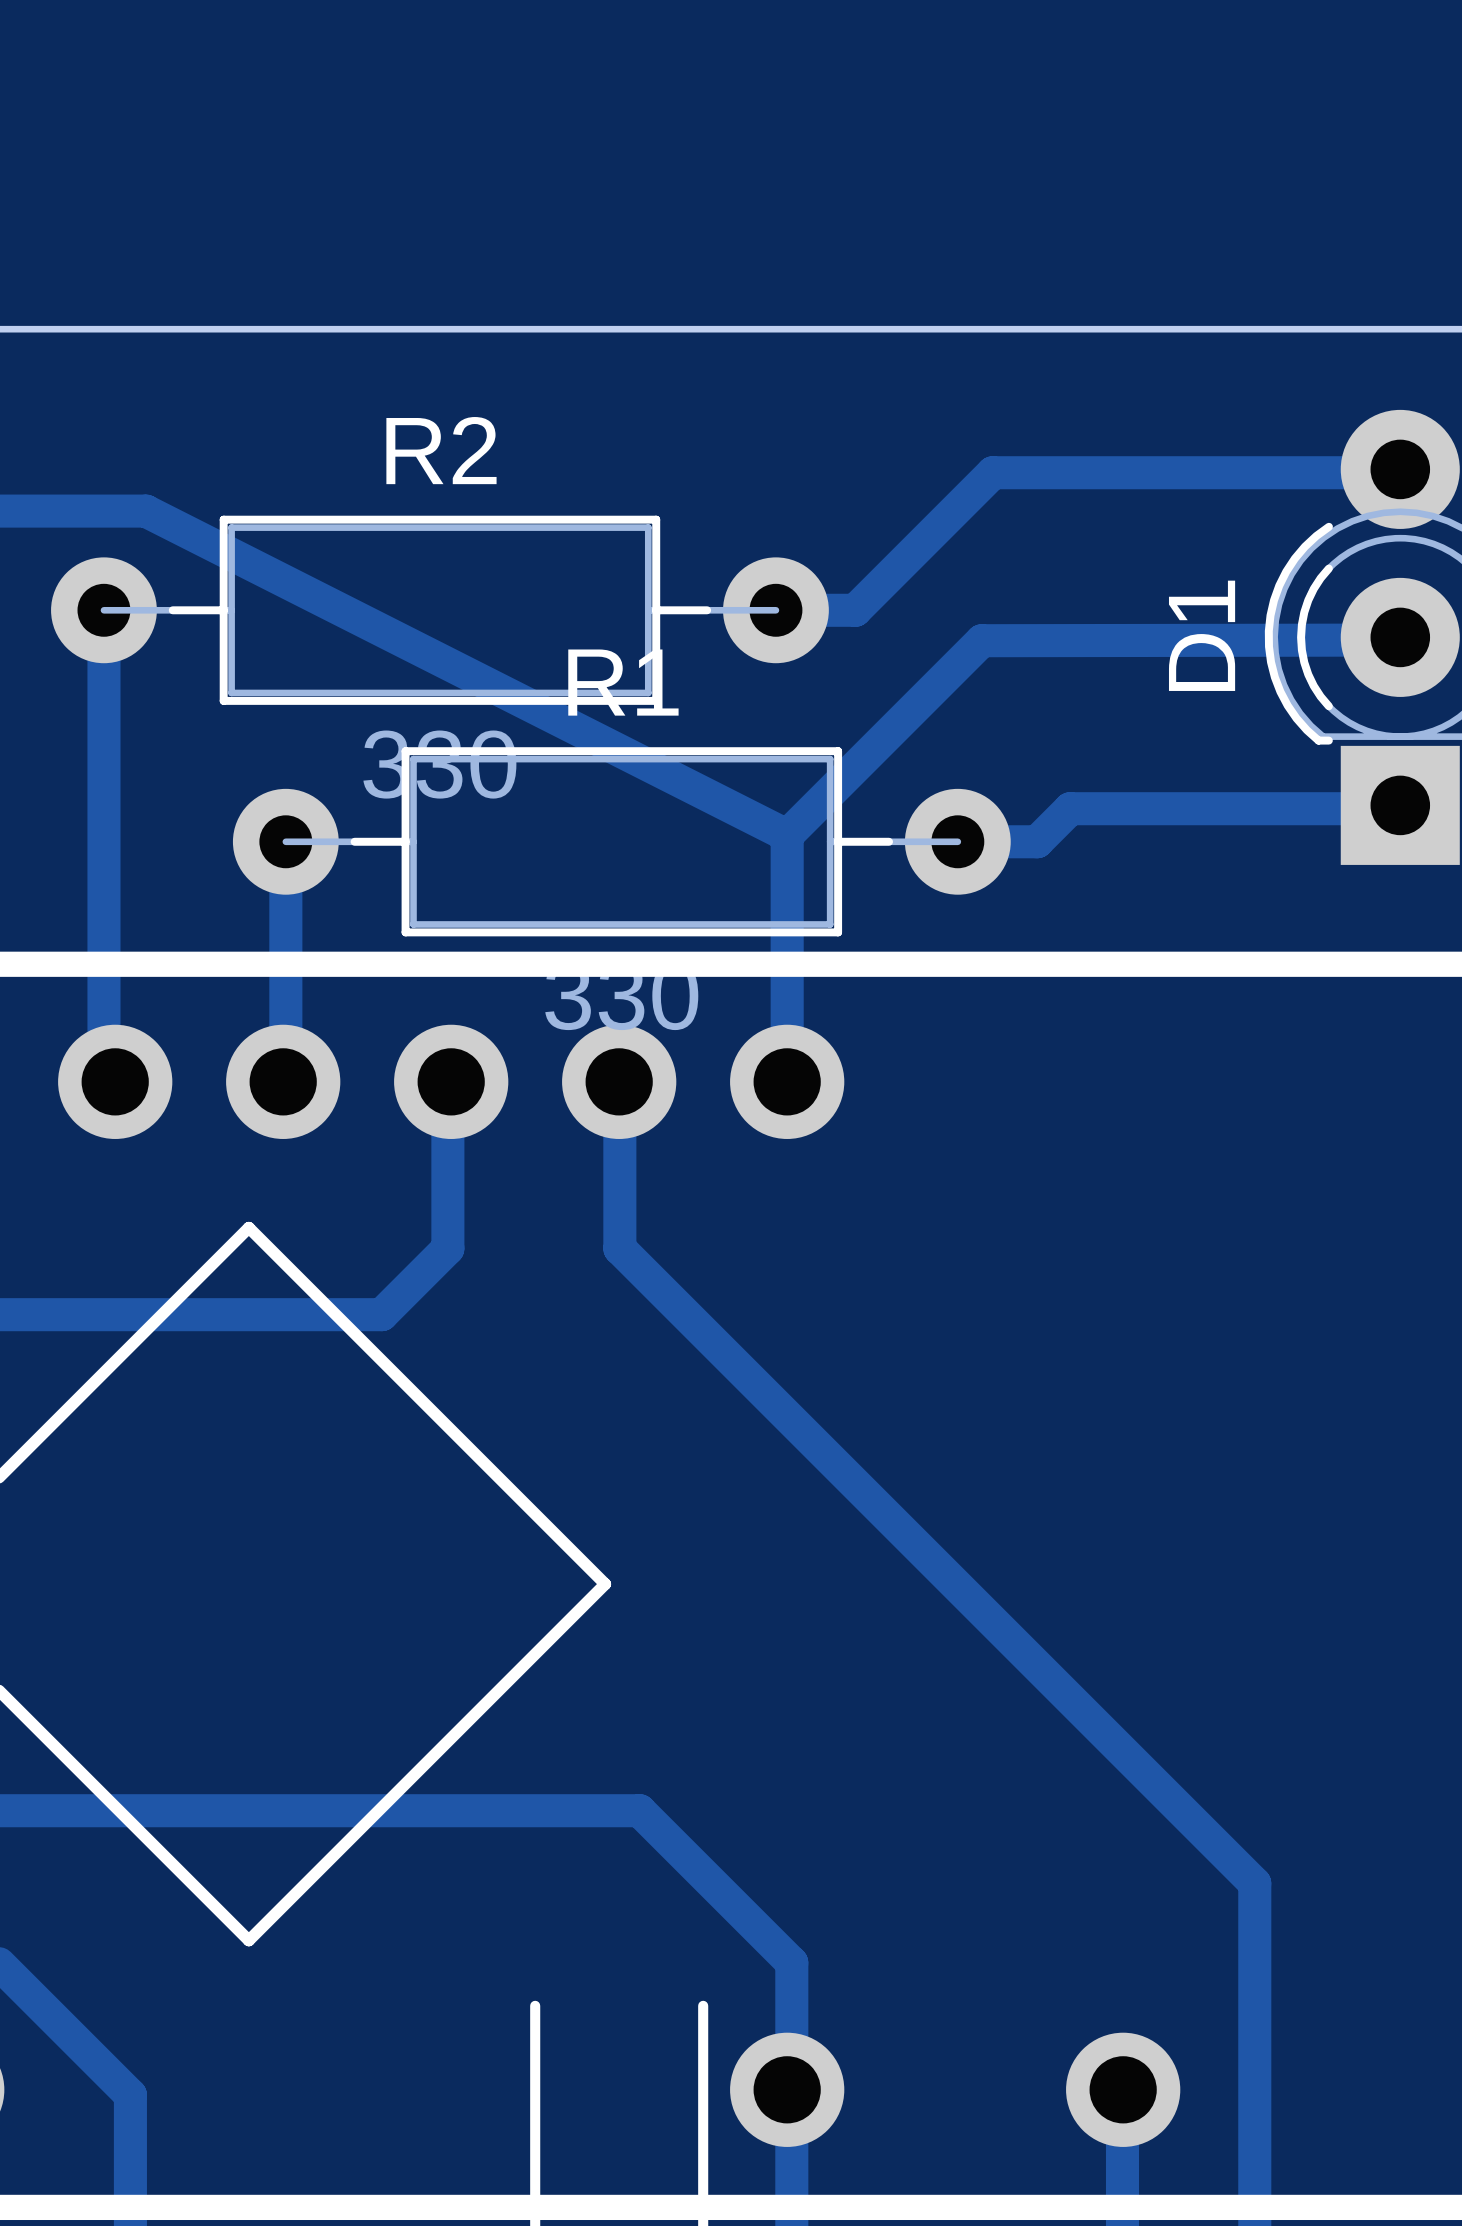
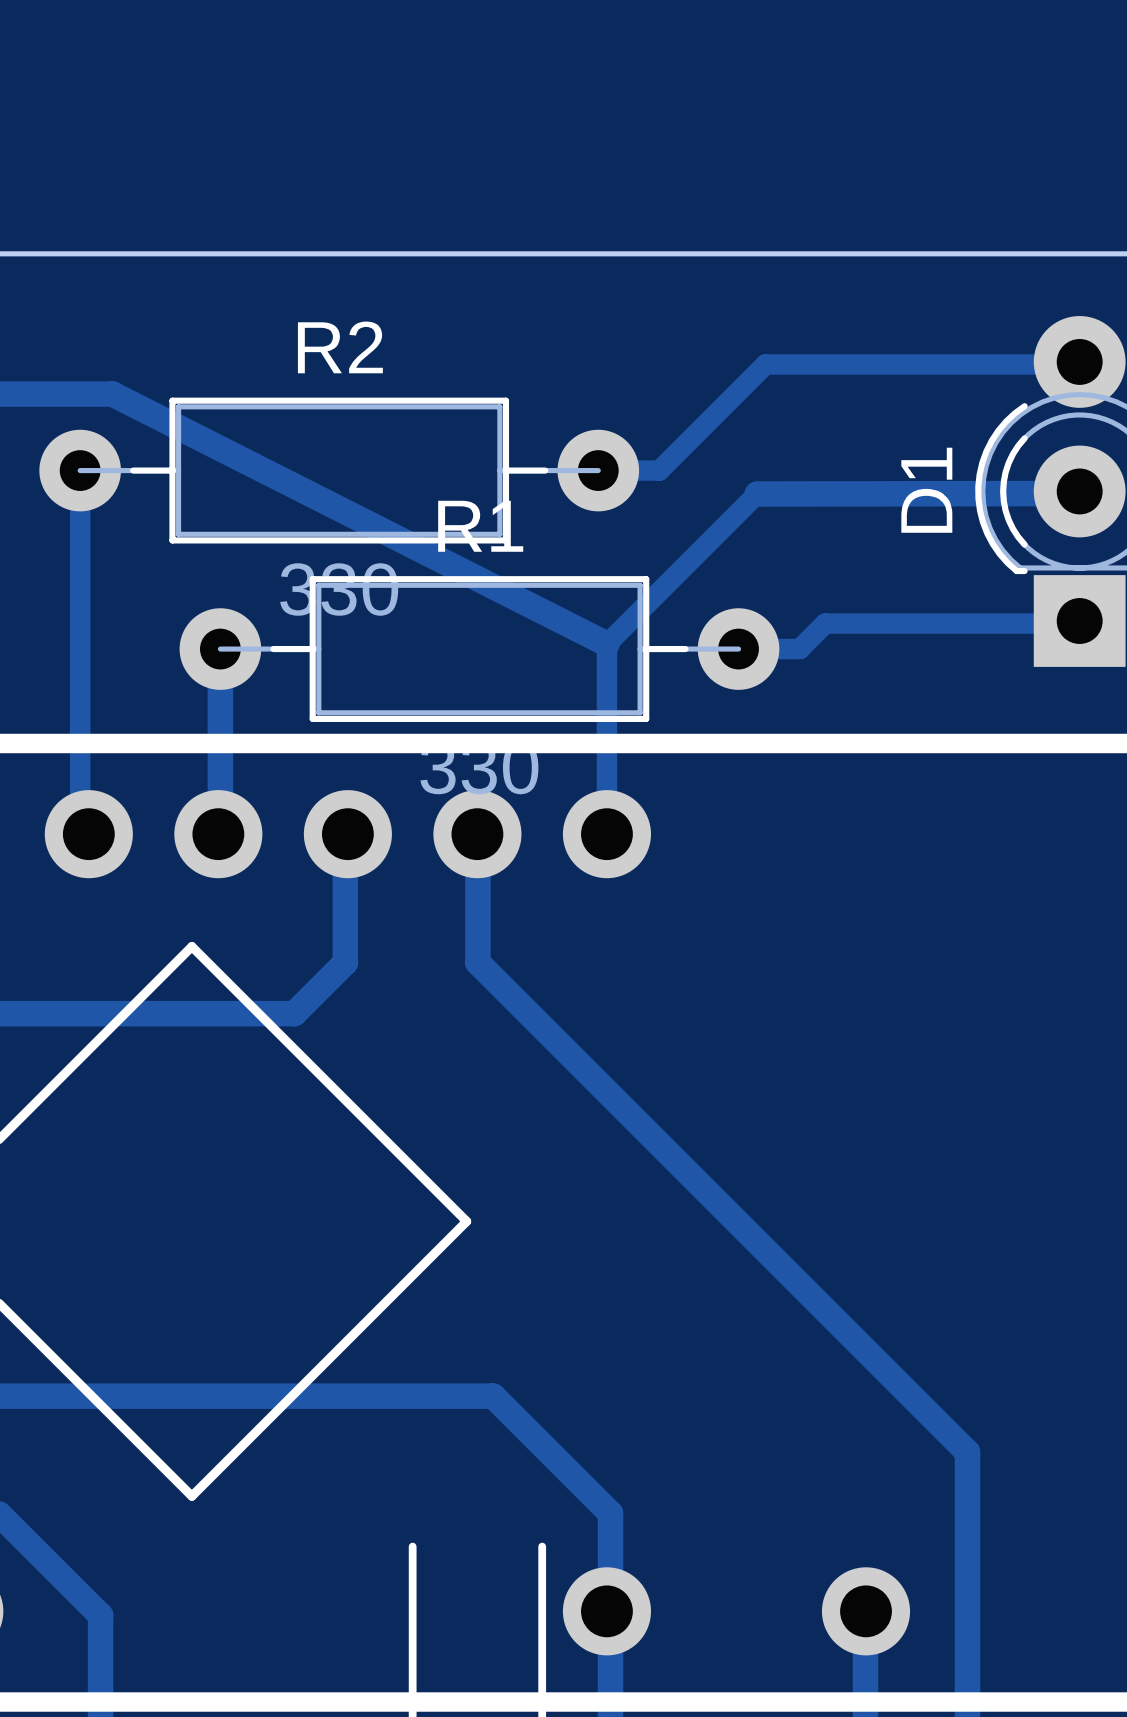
track width: thick (1400, 472) (992, 472) (855, 610) (775, 610) -> thin (1079, 364) (765, 364) (659, 470) (598, 470)
track width: thick (103, 610) (103, 1070) -> thin (80, 470) (80, 825)
track width: thick (981, 640) (787, 835) (787, 1081) -> thin (757, 494) (606, 644) (606, 834)
track width: thick (1400, 808) (1070, 808) (1037, 841) (957, 841) -> thin (1079, 623) (825, 623) (799, 649) (738, 649)

